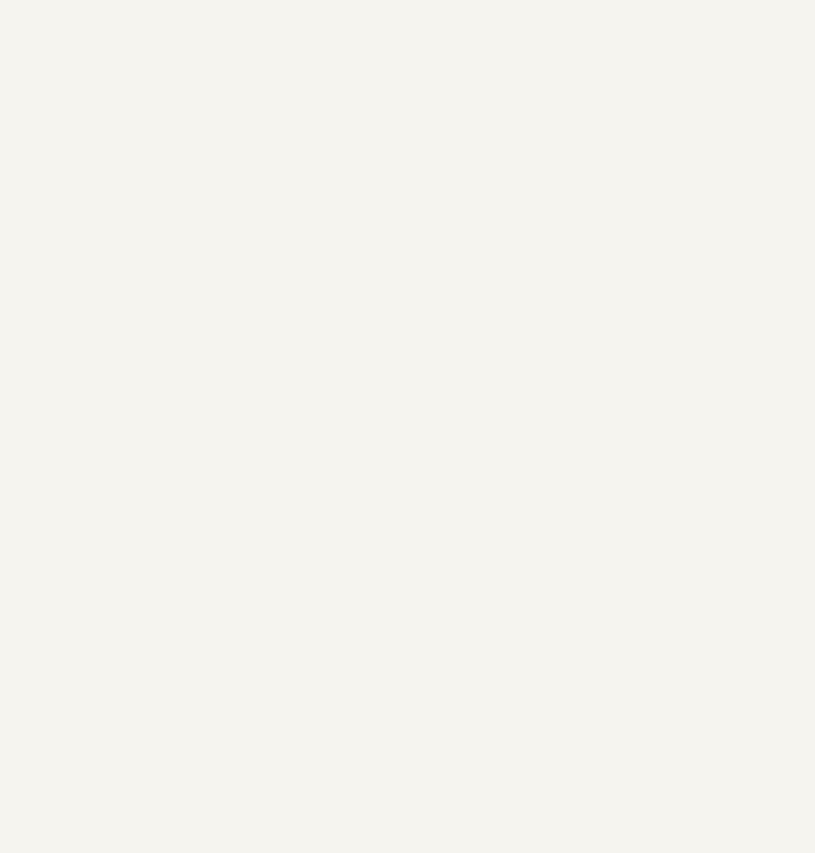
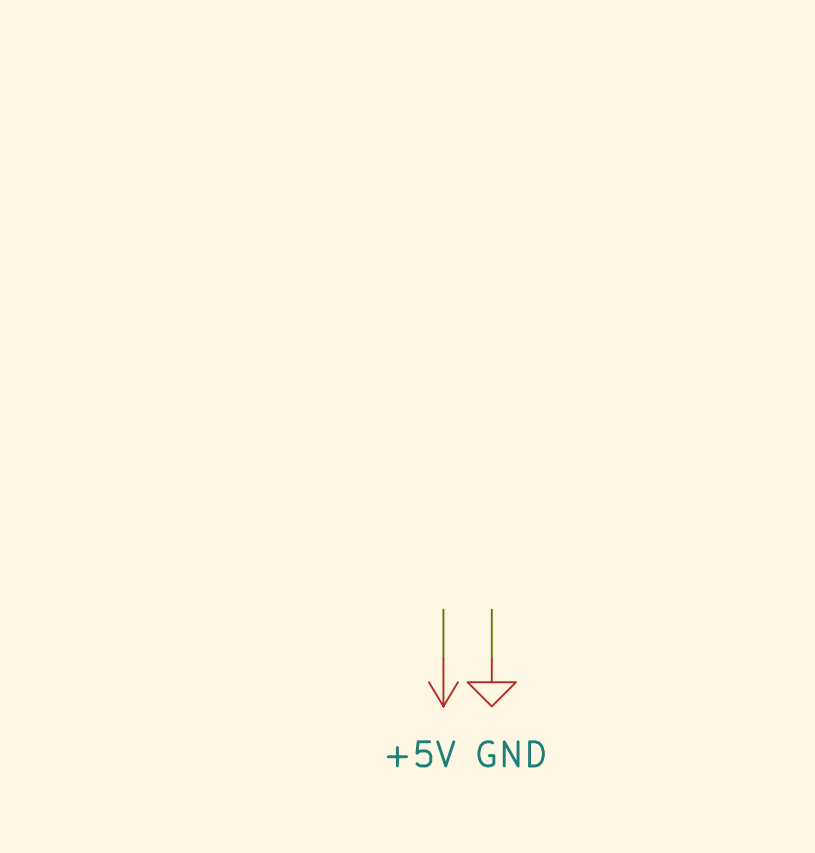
wire: none -> (443, 609) (443, 658)
wire: none -> (491, 609) (491, 658)
power symbol: none -> +5V (443, 682)
power symbol: none -> GND (491, 682)

